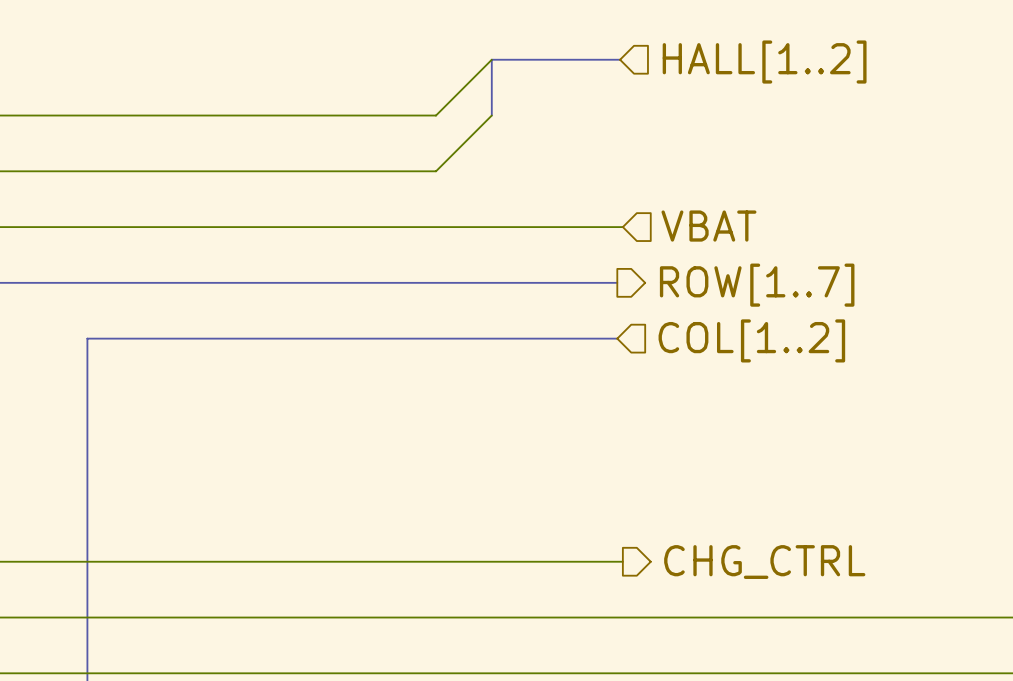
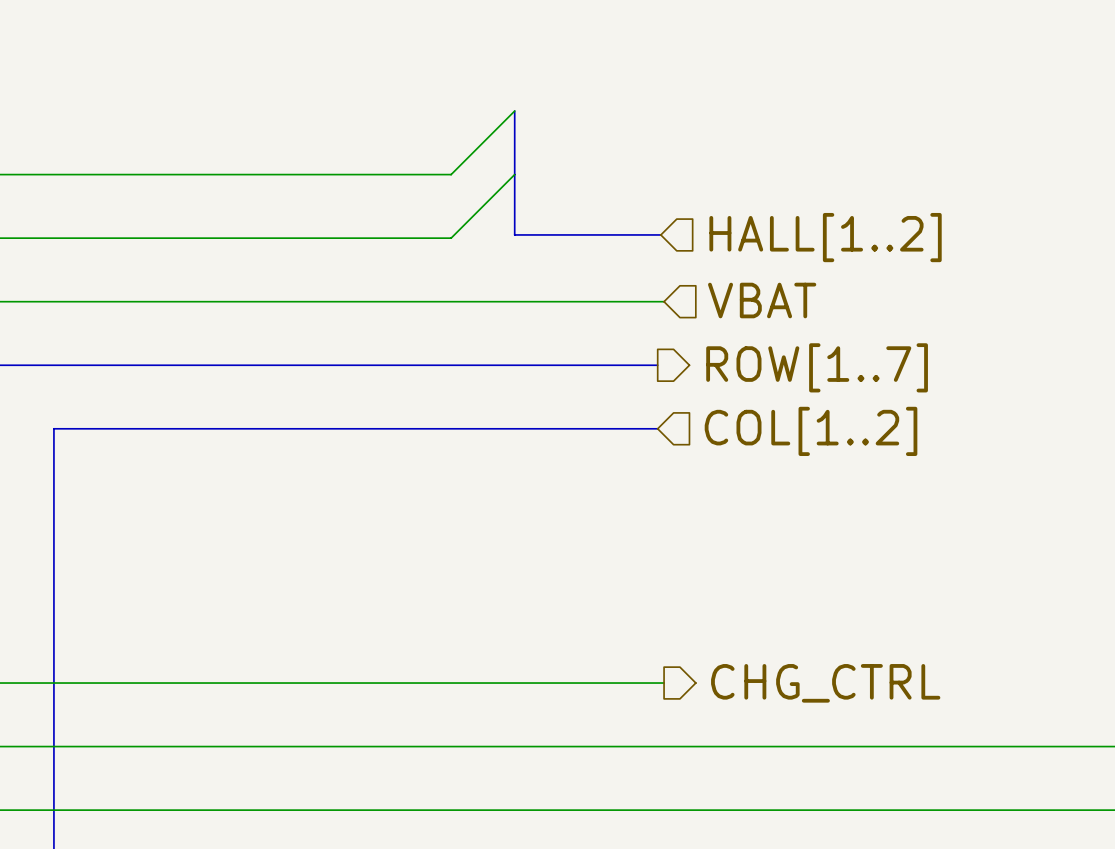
bus: (491, 59) (620, 59) -> none
hierarchical label position: HALL[1..2] (764, 62) -> HALL[1..2] (825, 237)
bus: none -> (514, 174) (514, 234) (660, 234)

